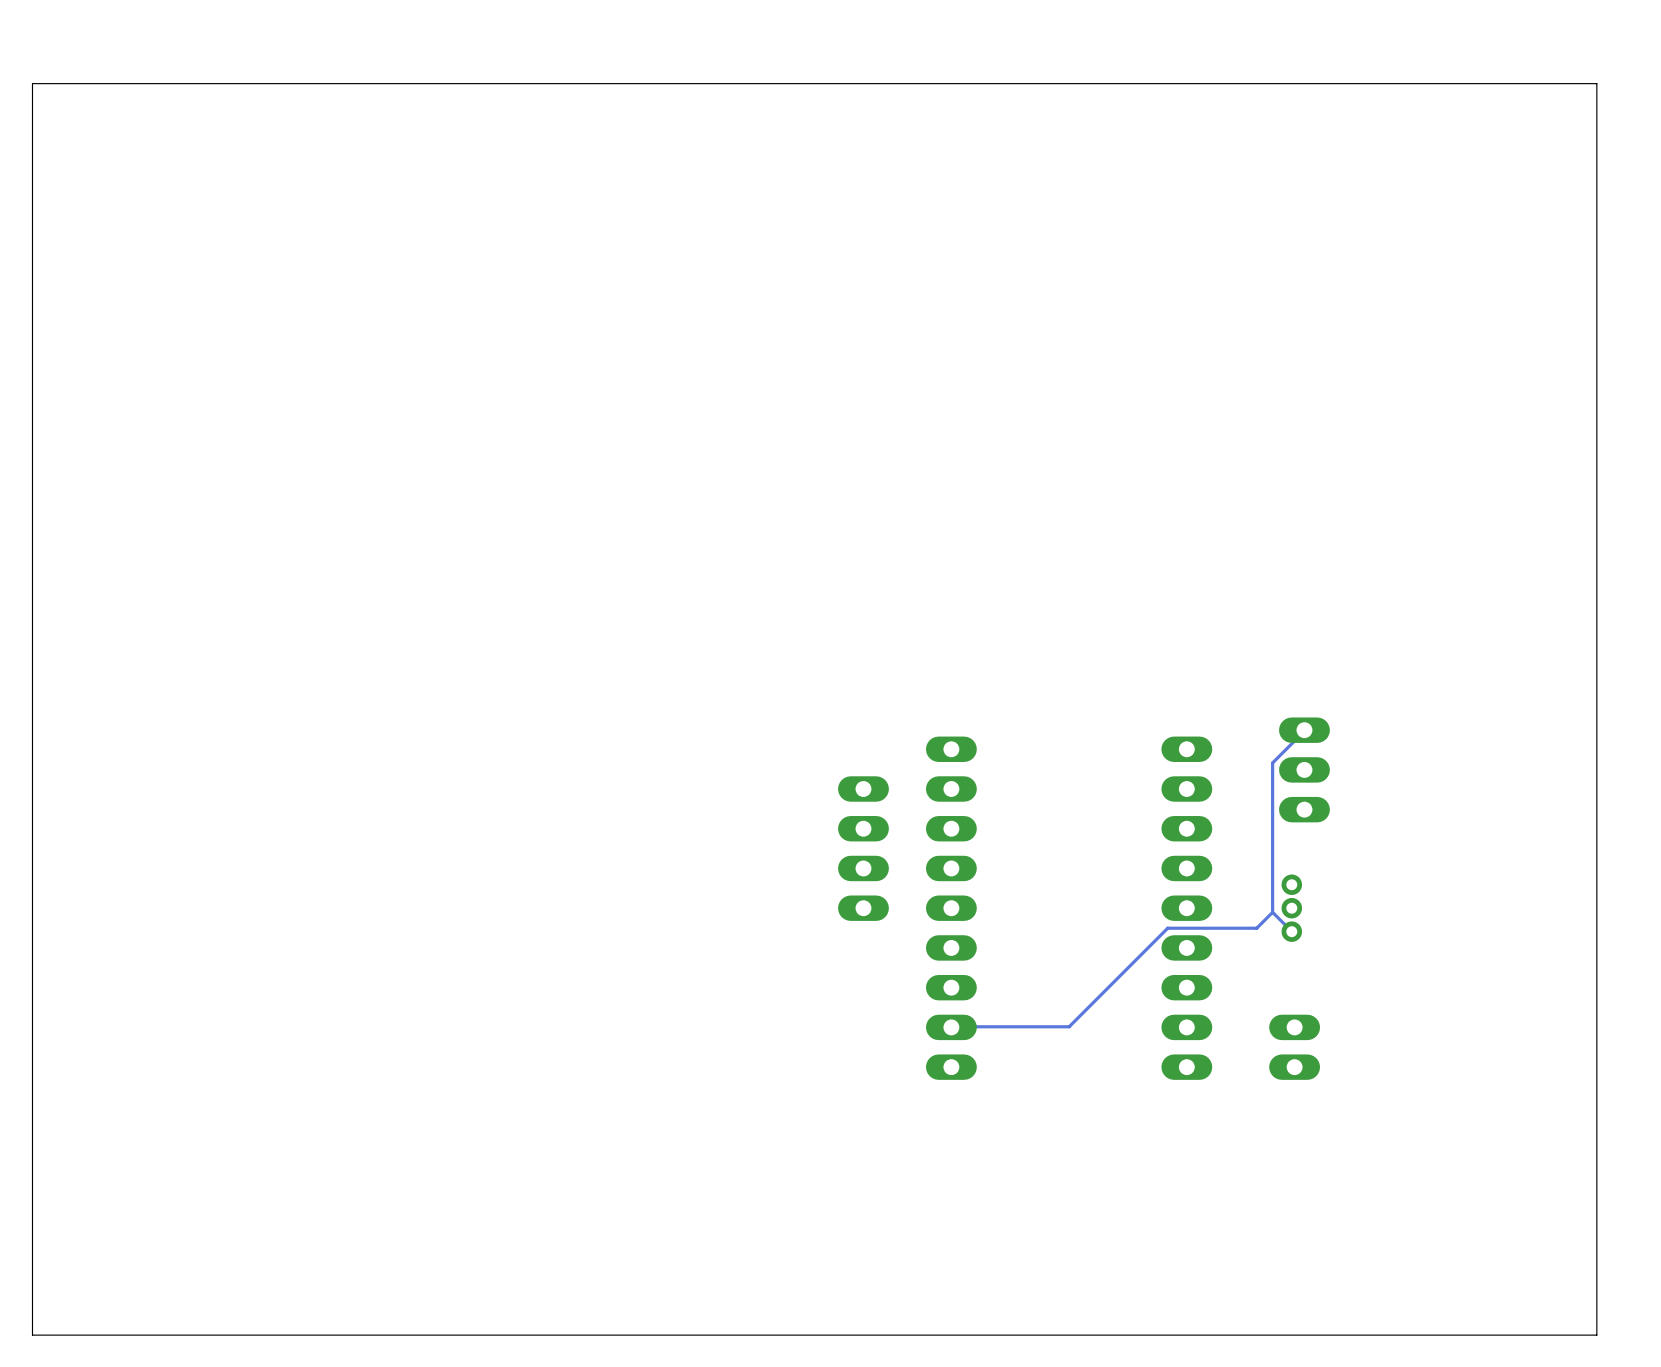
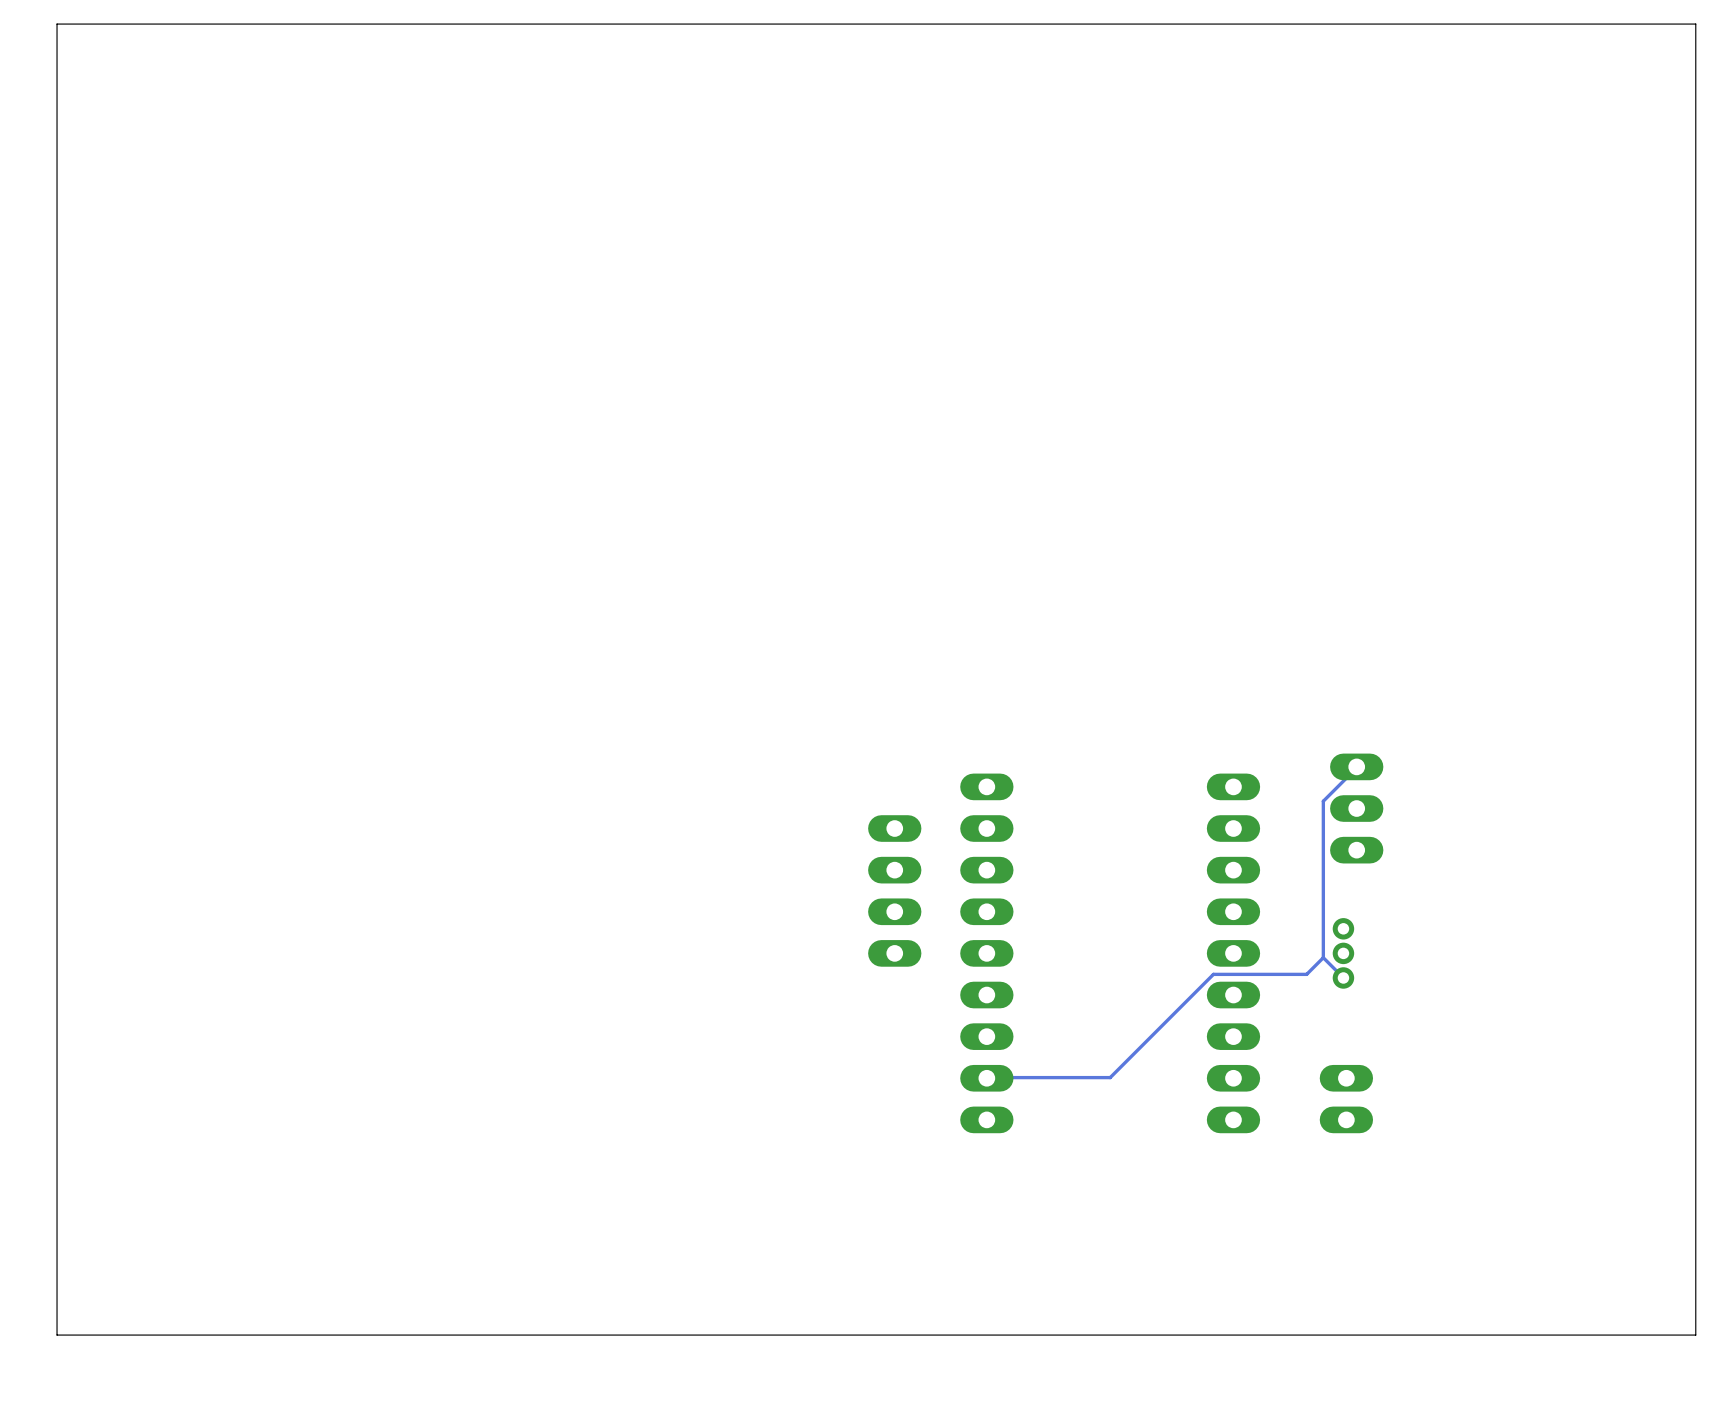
board edge: (1596, 83) (32, 83) (32, 1335) (1596, 1335) (1596, 83) -> (1695, 24) (57, 24) (57, 1335) (1695, 1335) (1695, 24)

